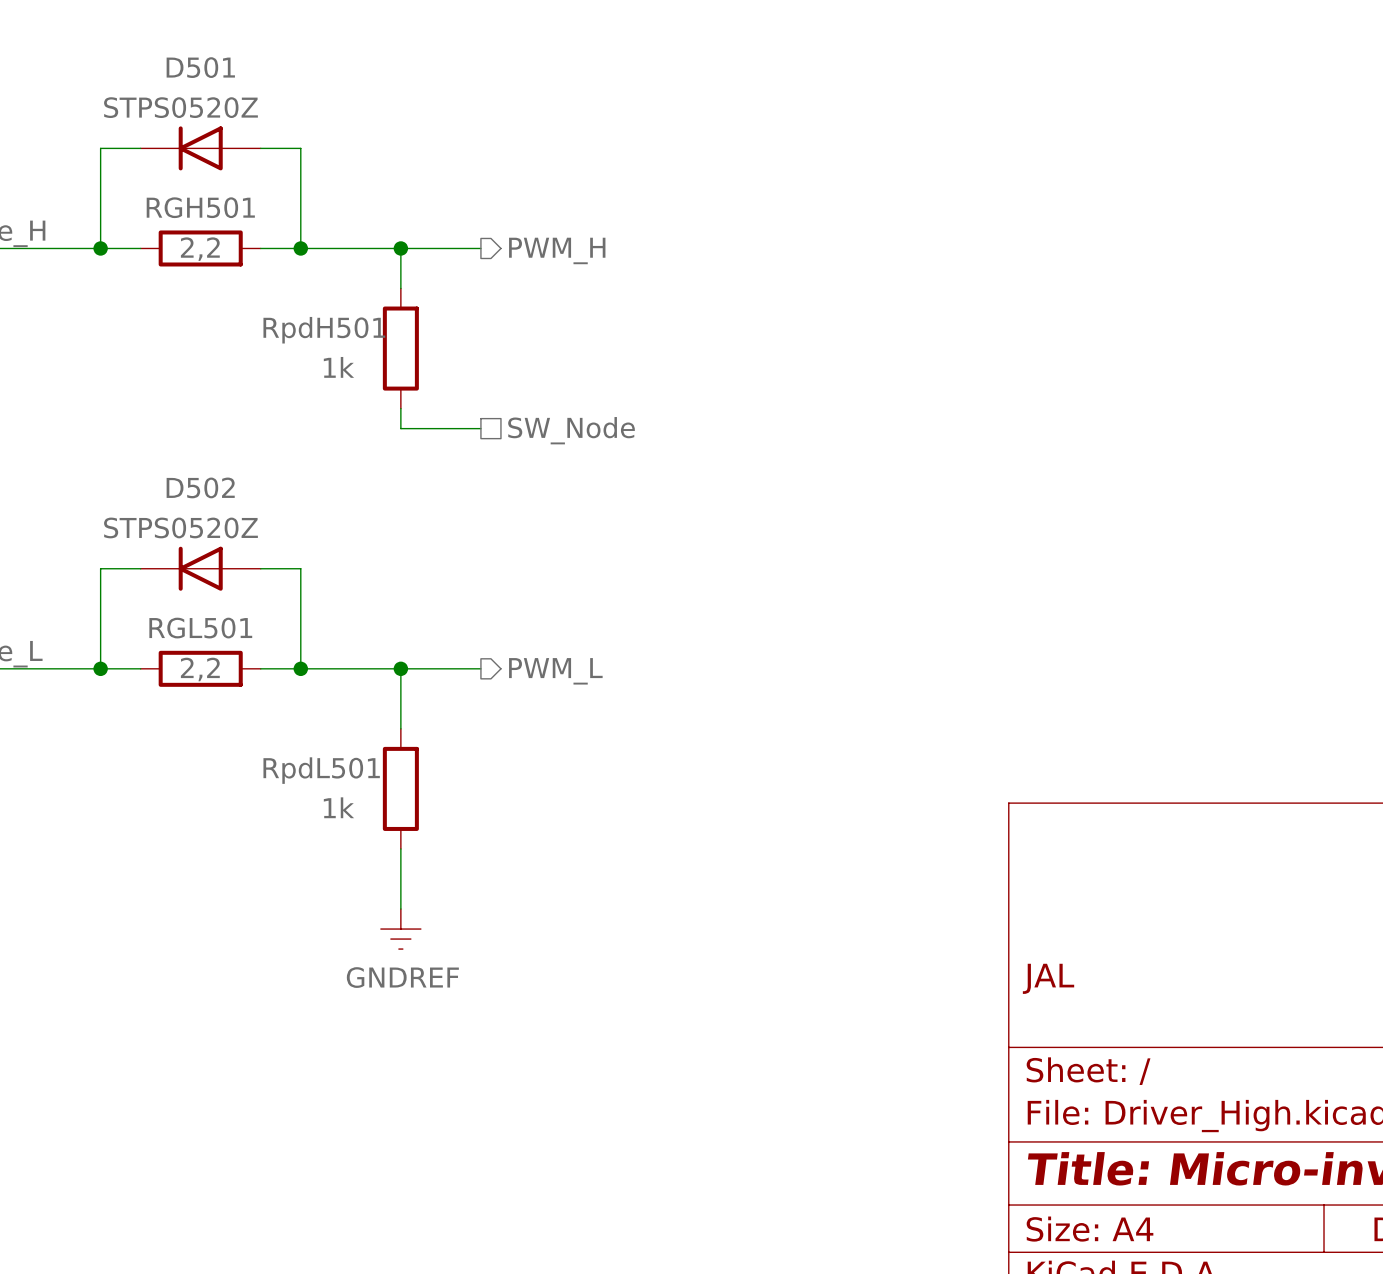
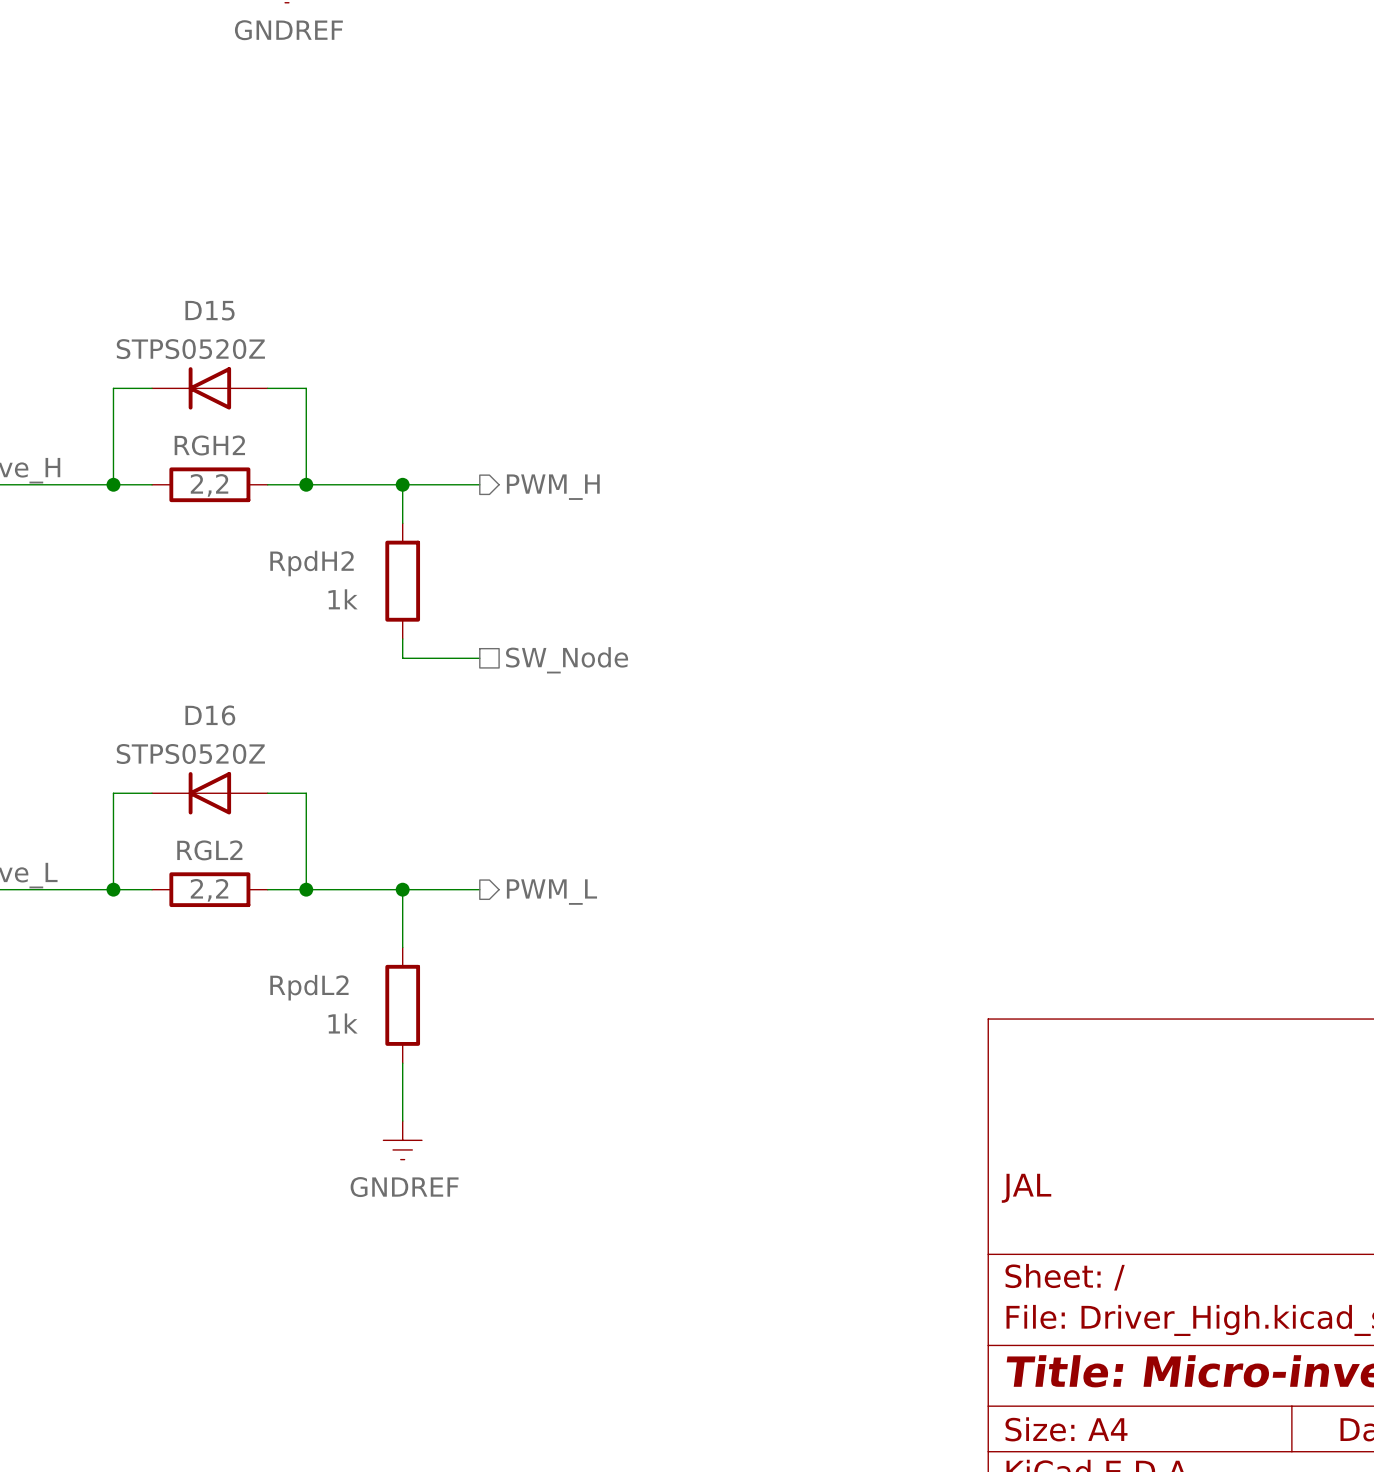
D501 name: D501 (200, 67) -> D15 (210, 310)
RGH501 name: RGH501 (200, 207) -> RGH2 (209, 445)
RpdH501 name: RpdH501 (324, 330) -> RpdH2 (312, 563)
D502 name: D502 (200, 487) -> D16 (210, 715)
RGL501 name: RGL501 (200, 628) -> RGL2 (209, 850)
RpdL501 name: RpdL501 (321, 770) -> RpdL2 (309, 987)

